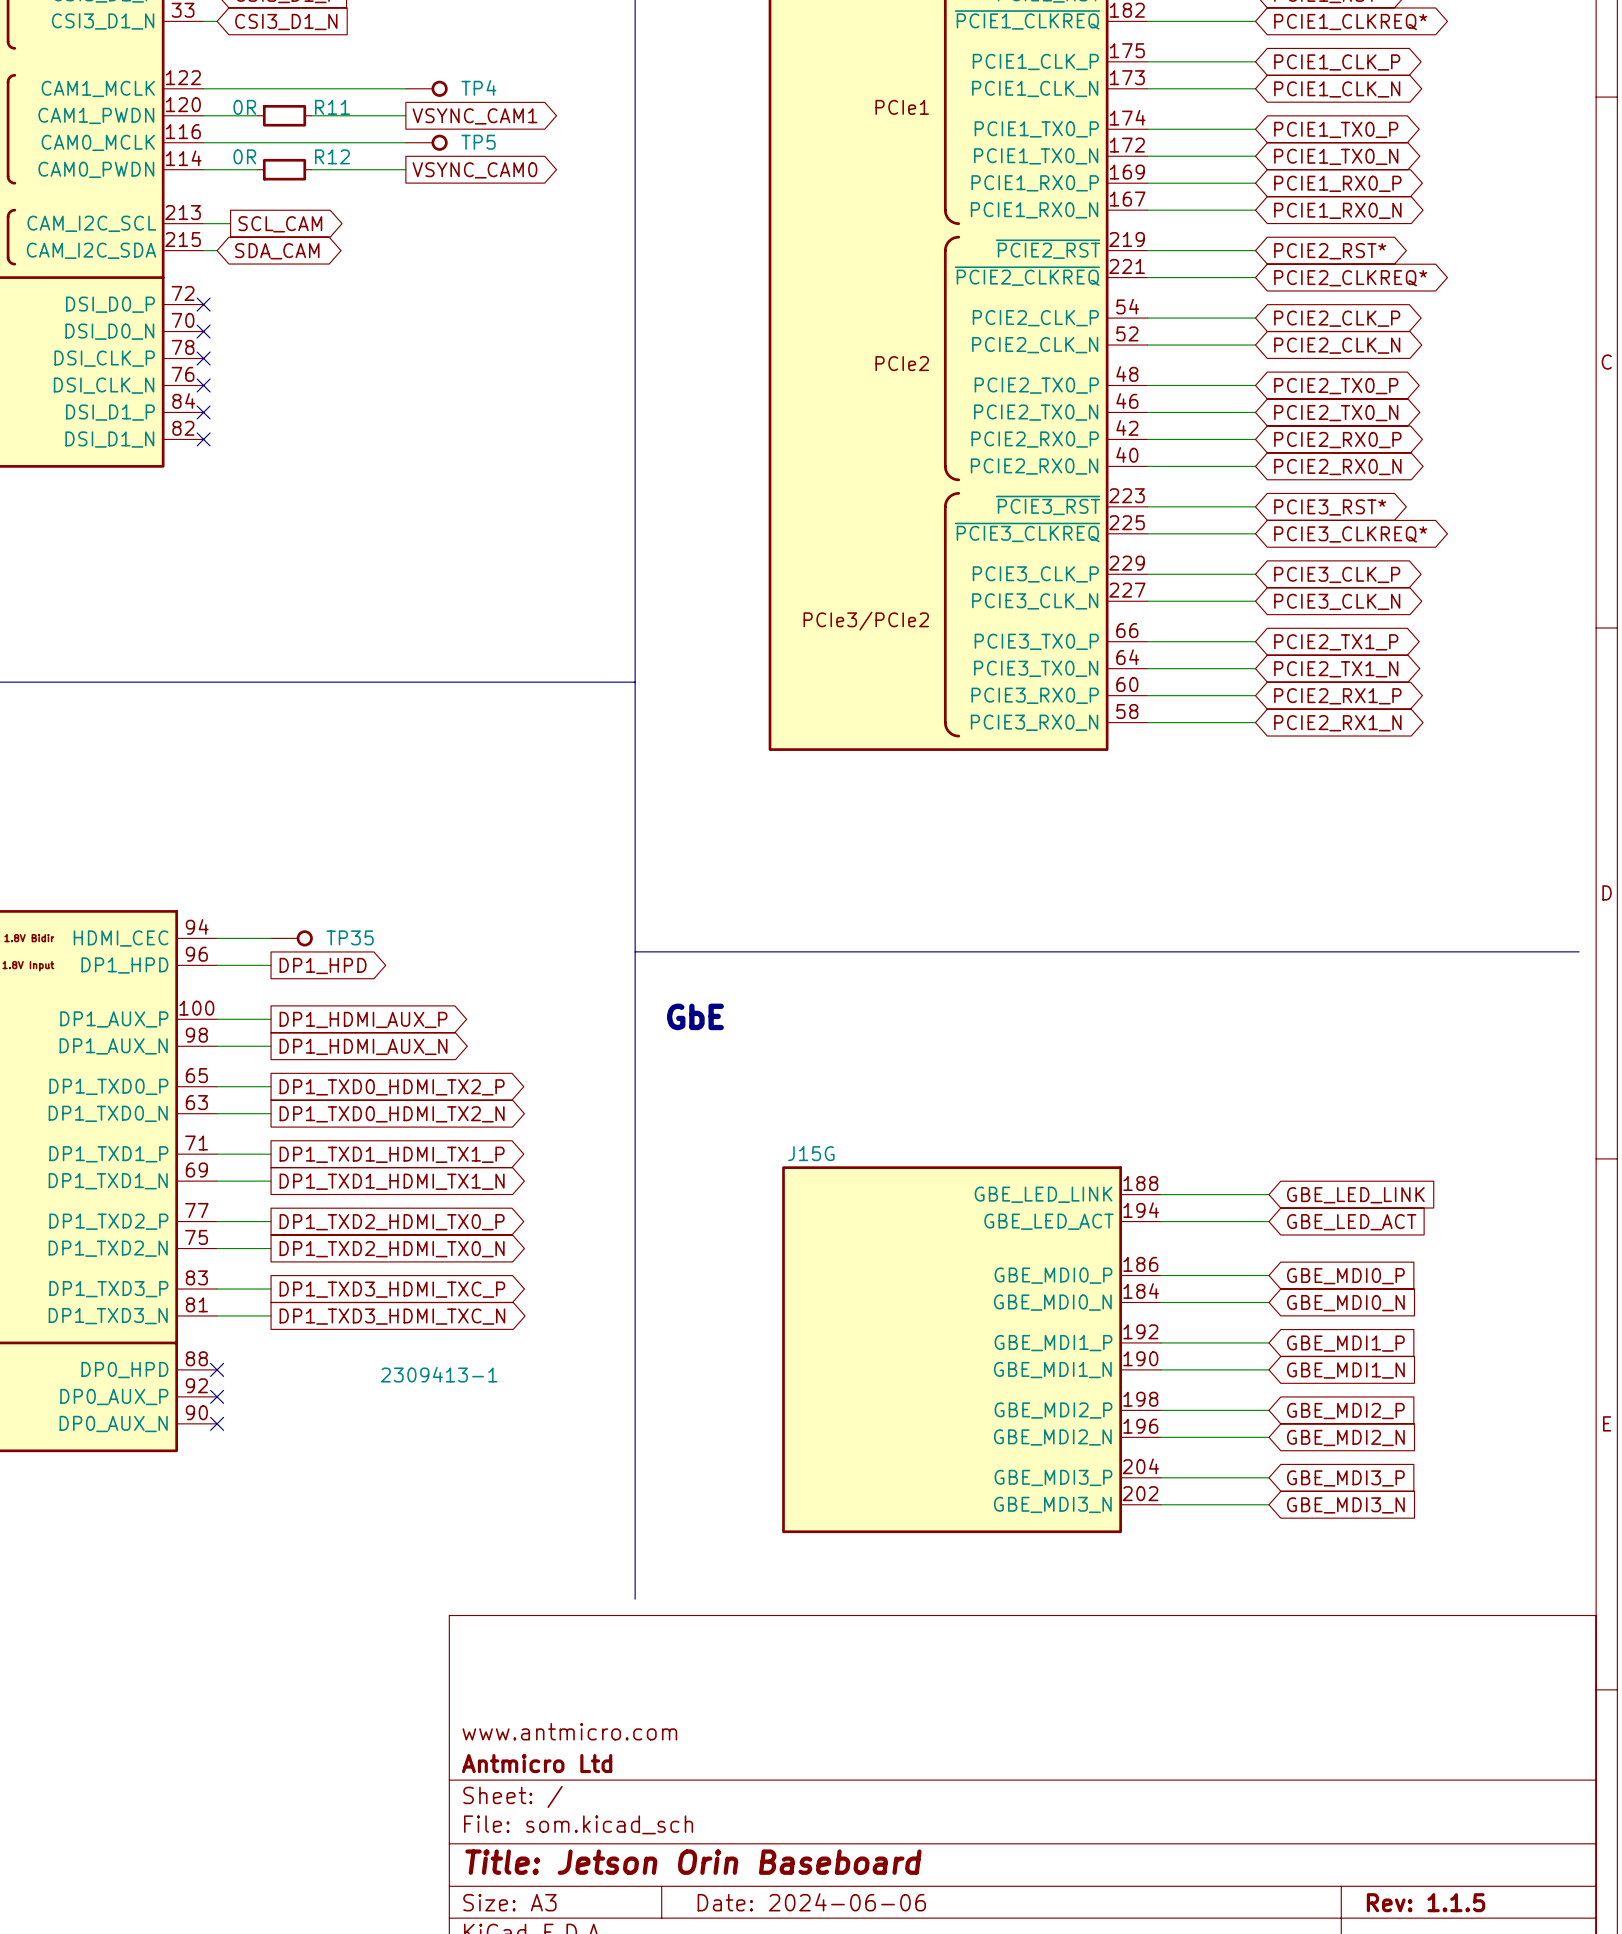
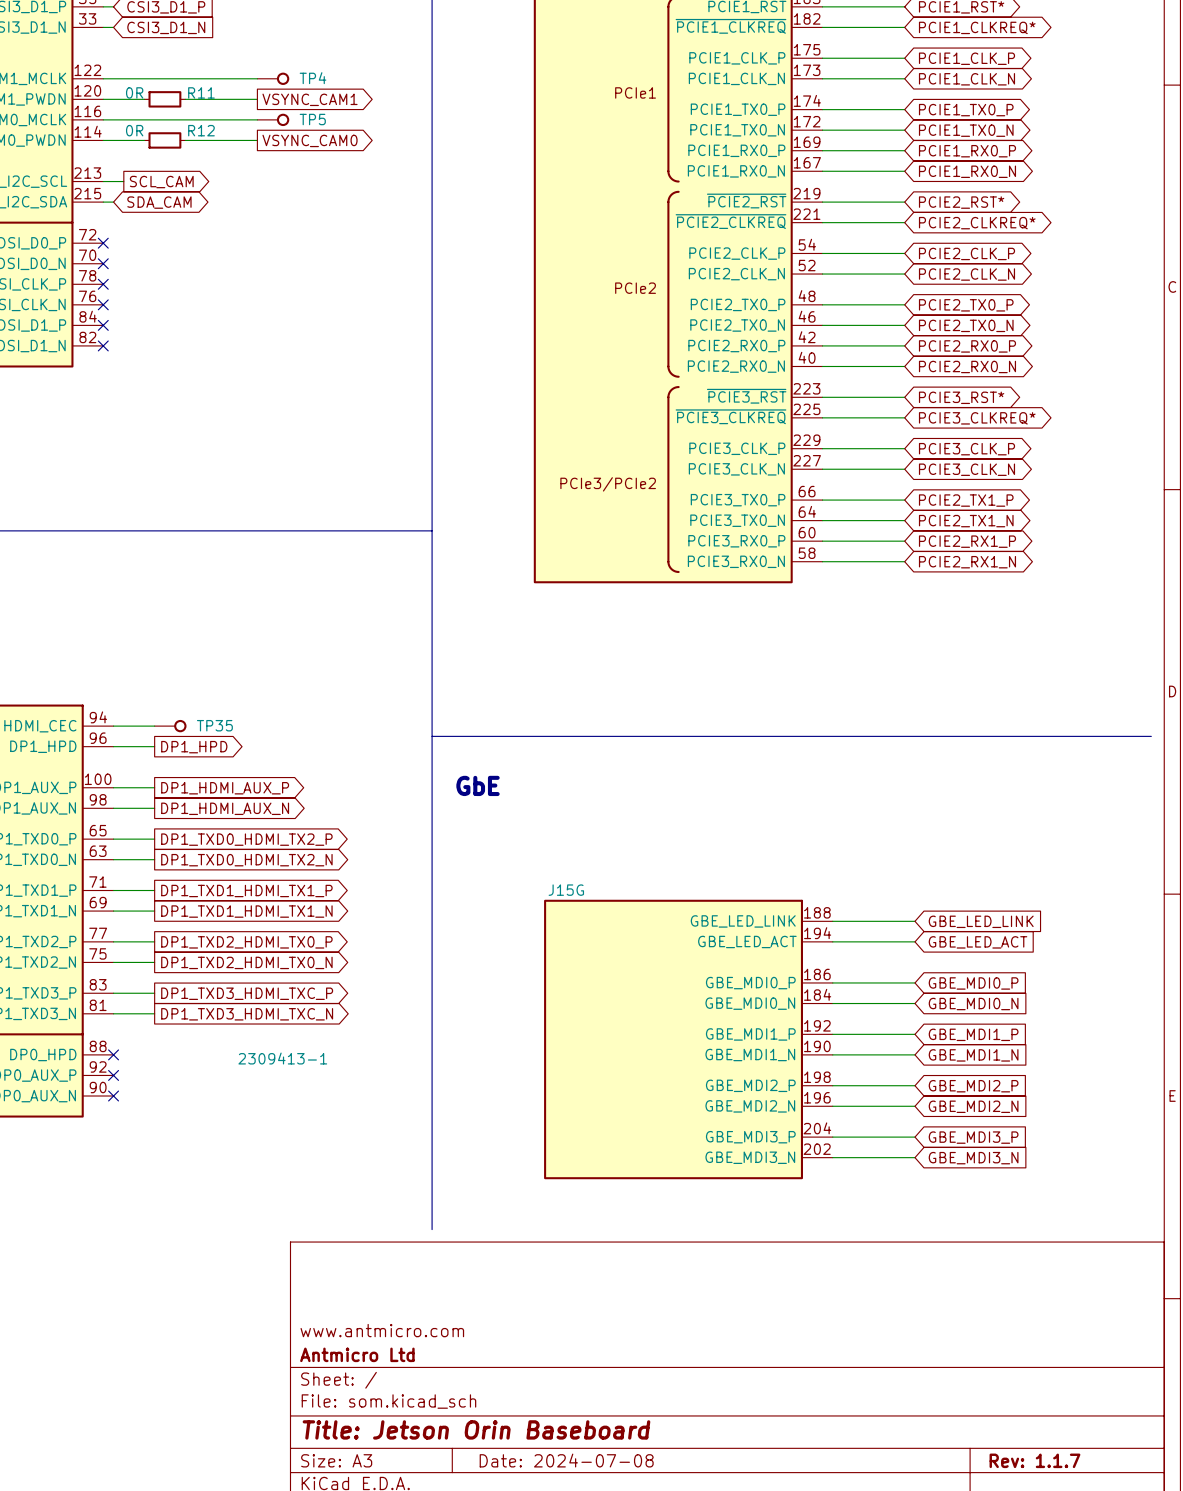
title block: Date: 2024-06-06 (811, 1902) -> Date: 2024-07-08 (566, 1460)
title block: Rev: 1.1.5 (1426, 1902) -> Rev: 1.1.7 (1034, 1460)

